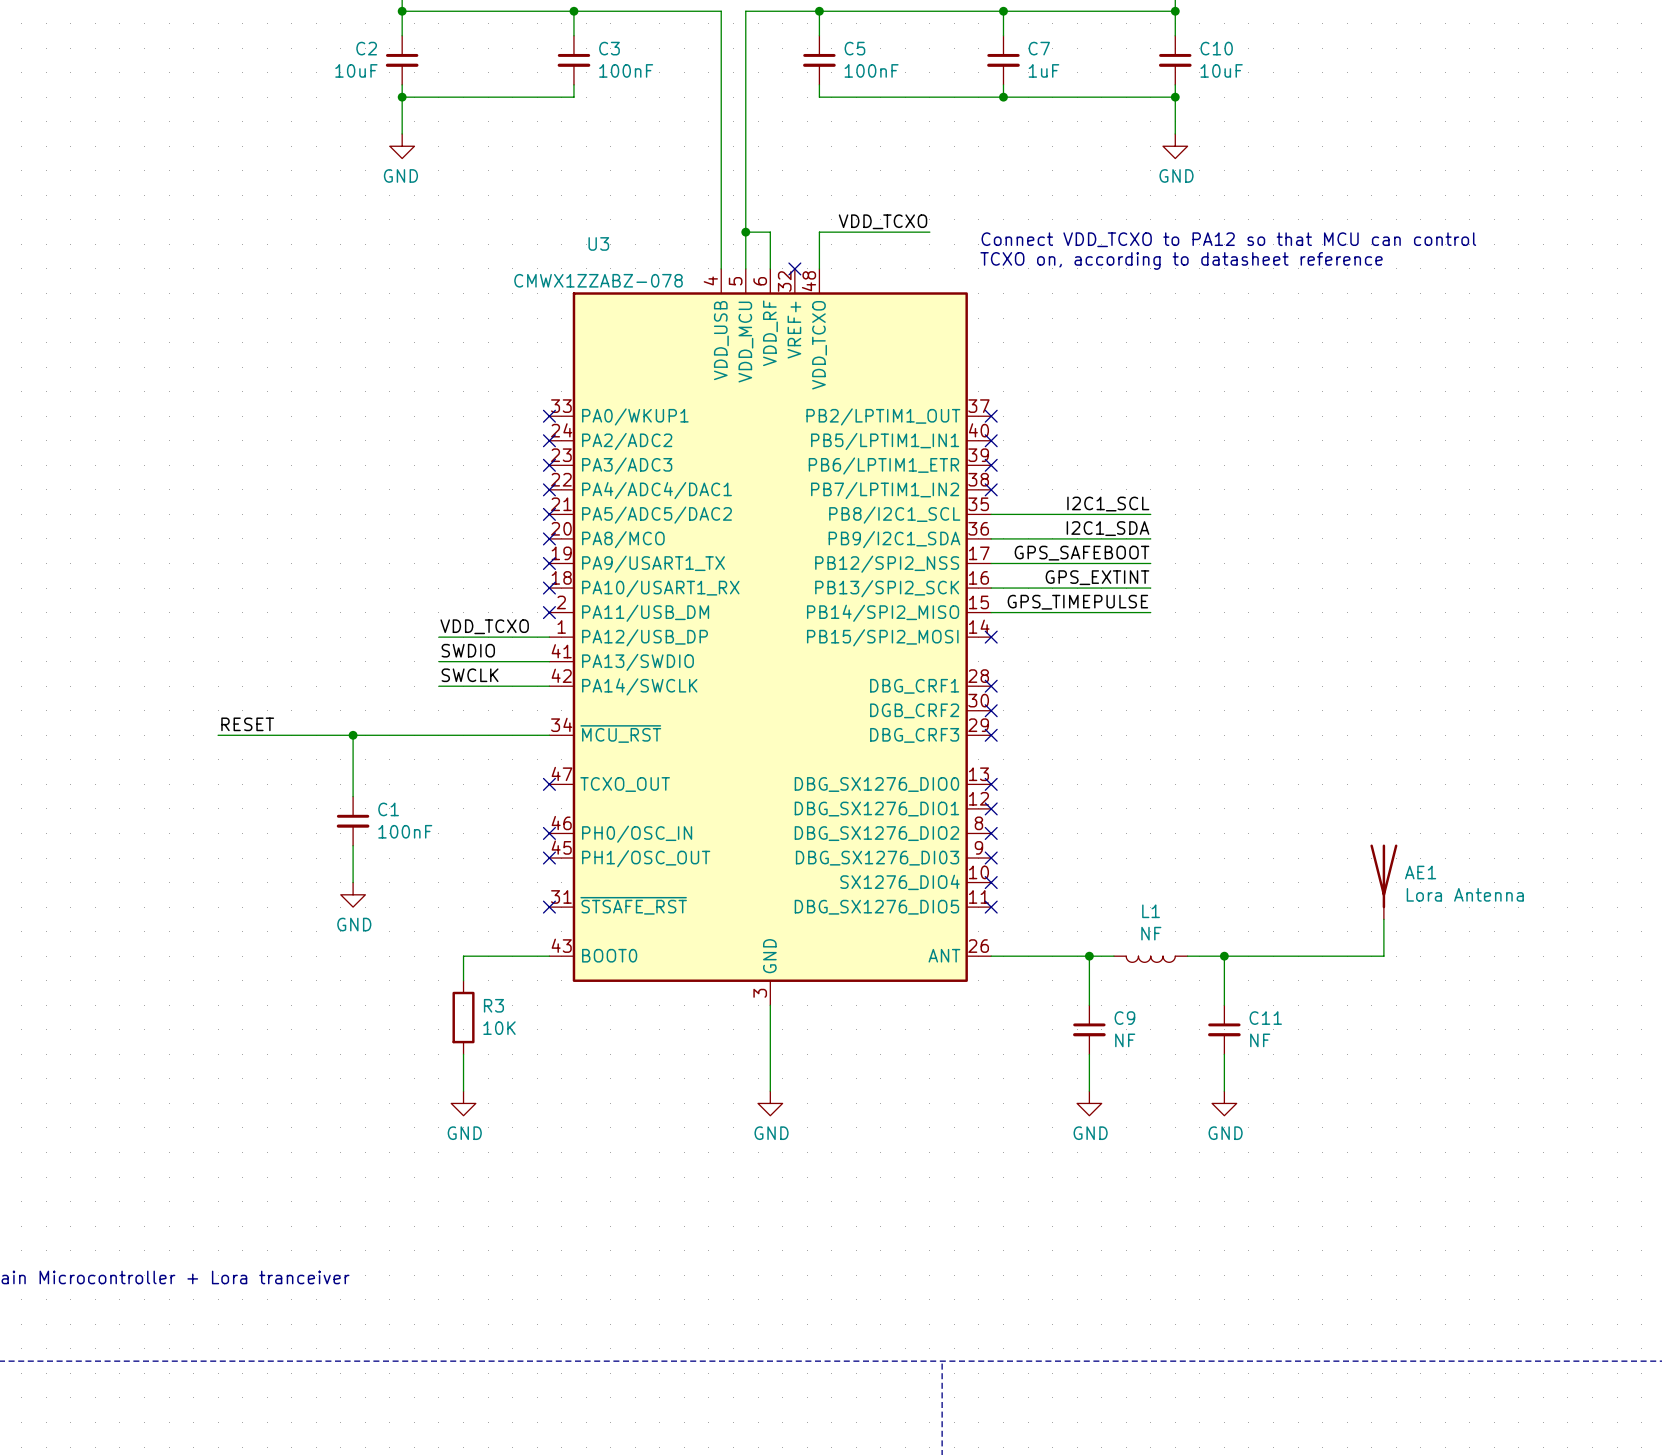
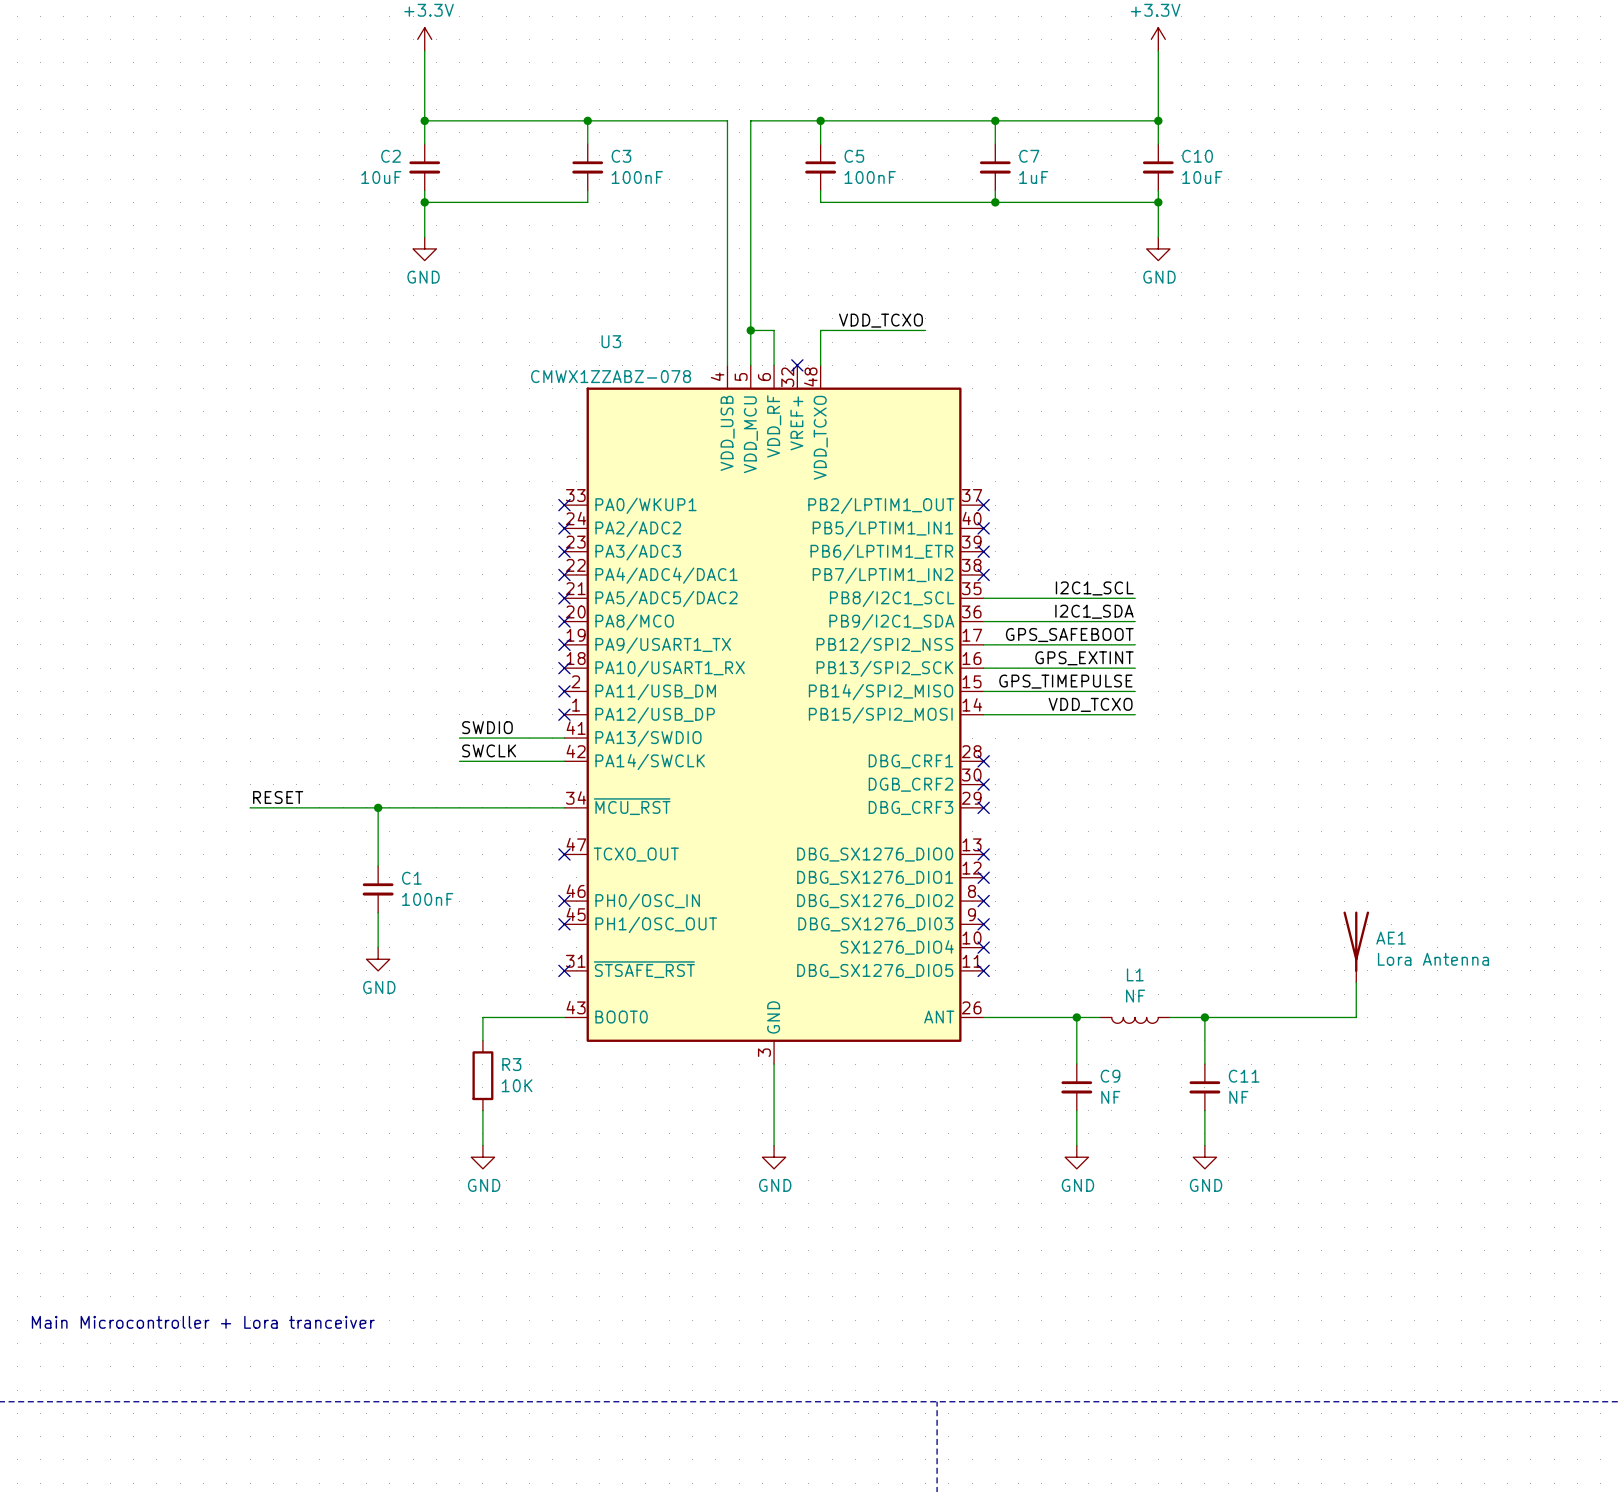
text: Connect VDD_TCXO to PA12 so that MCU can control (1228, 239) -> none
text: TCXO on, according to datasheet reference (1181, 260) -> none
label: VDD_TCXO (484, 626) -> none
label: none -> VDD_TCXO (1090, 704)
wire: (438, 637) (549, 637) -> none
no-connect mark: none -> (564, 714)
wire: none -> (983, 714) (1135, 714)
no-connect mark: (991, 637) -> none

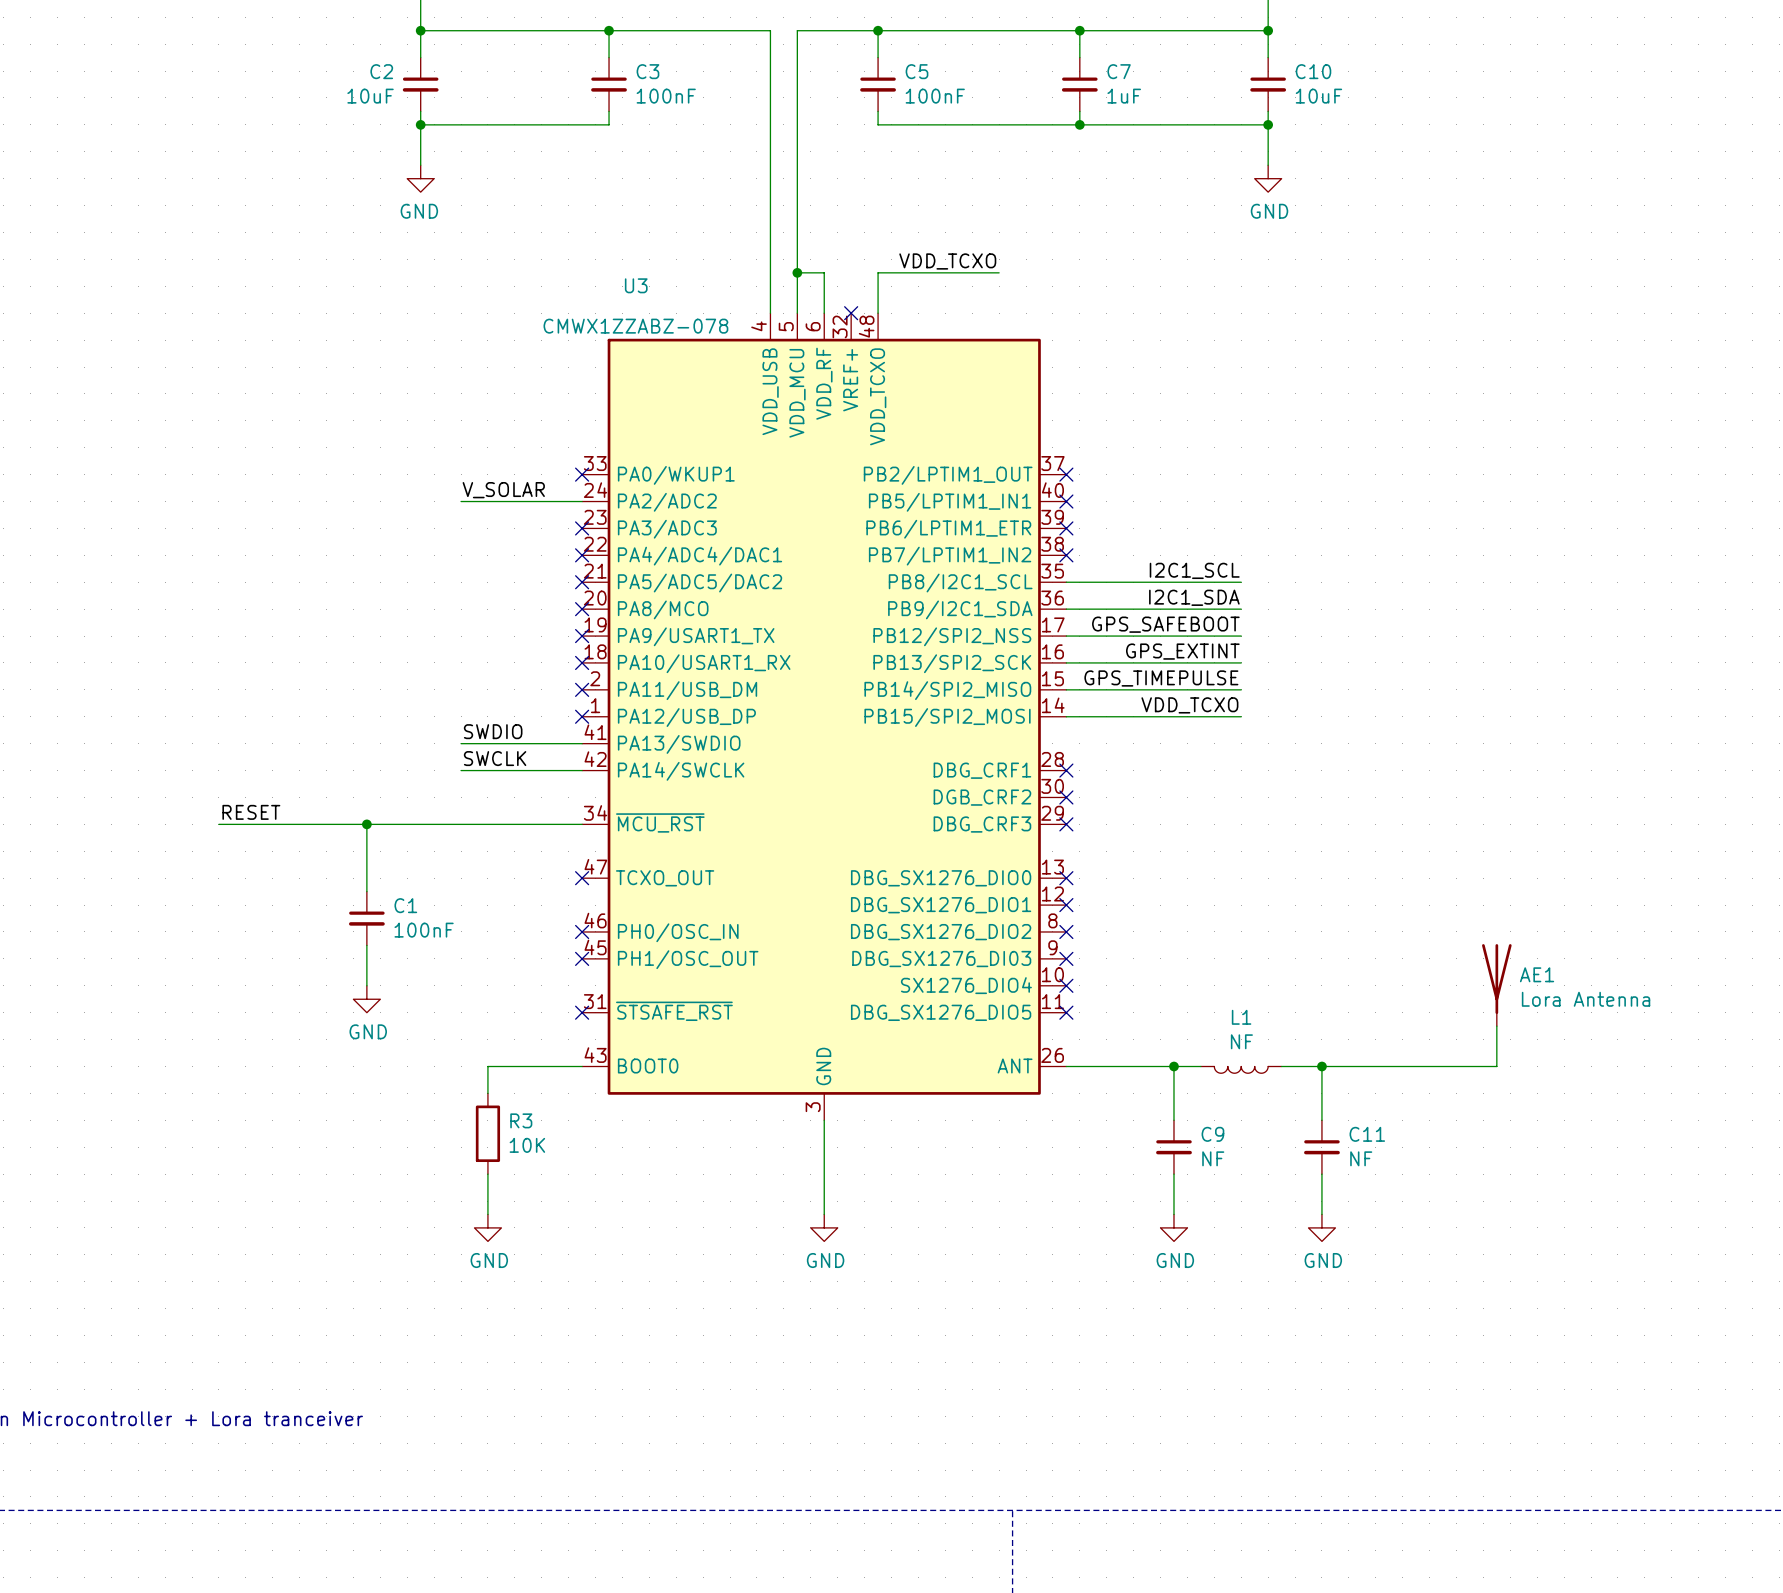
label: none -> V_SOLAR (503, 490)
wire: none -> (461, 501) (582, 501)
no-connect mark: (564, 528) -> none

